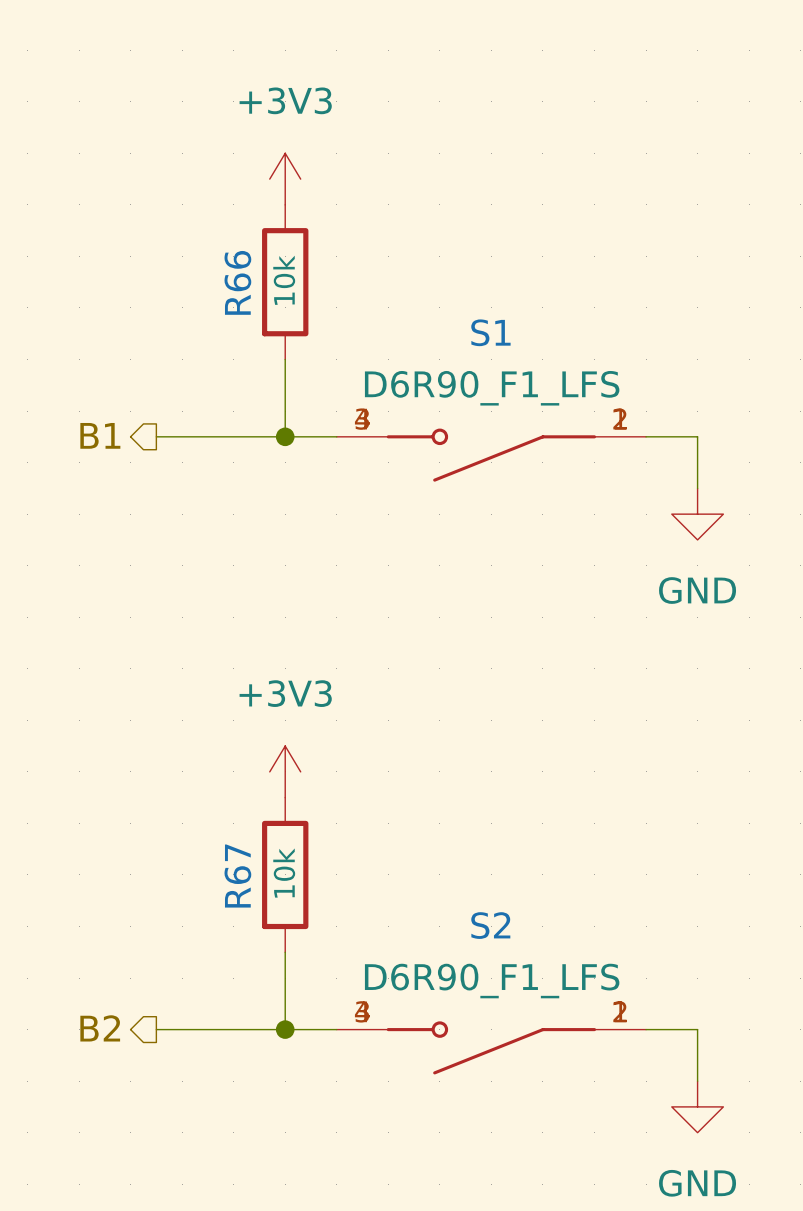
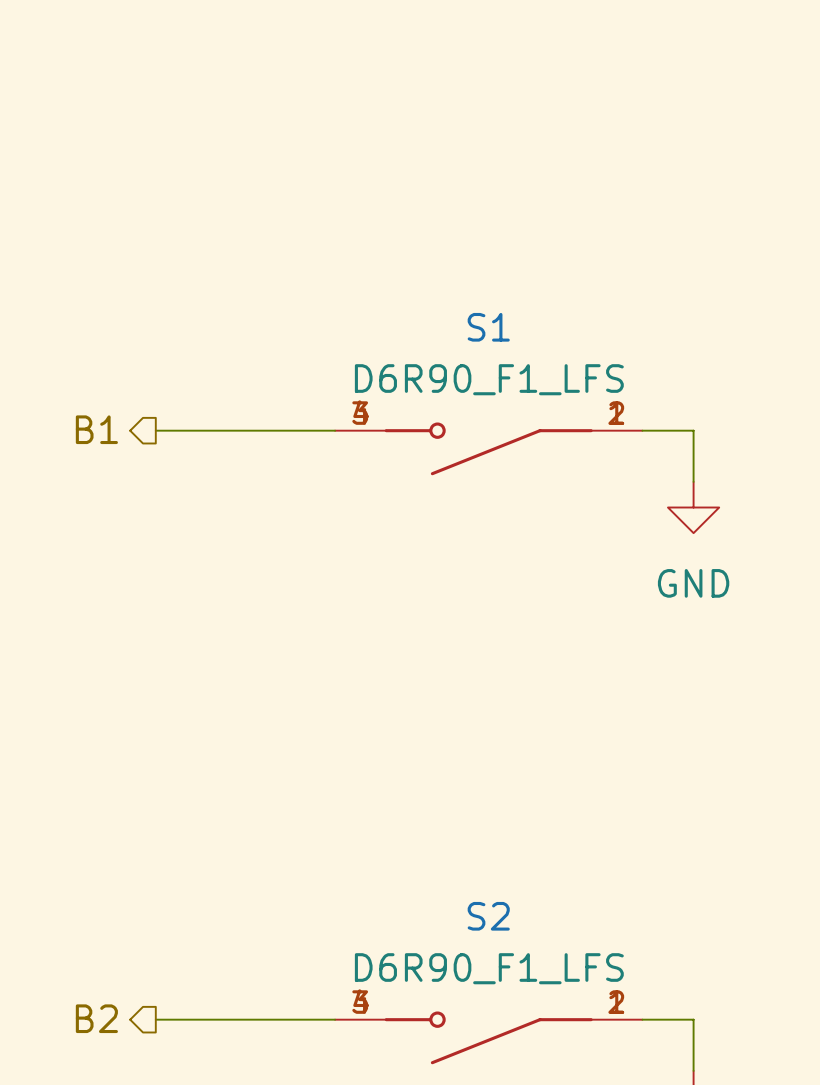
power symbol: +3V3 (285, 179) -> none
R66: 10k (285, 282) -> none
wire: (285, 359) (285, 436) -> none
junction: (285, 436) -> none
power symbol: +3V3 (285, 771) -> none
R67: 10k (285, 874) -> none
wire: (285, 952) (285, 1029) -> none
junction: (285, 1029) -> none

